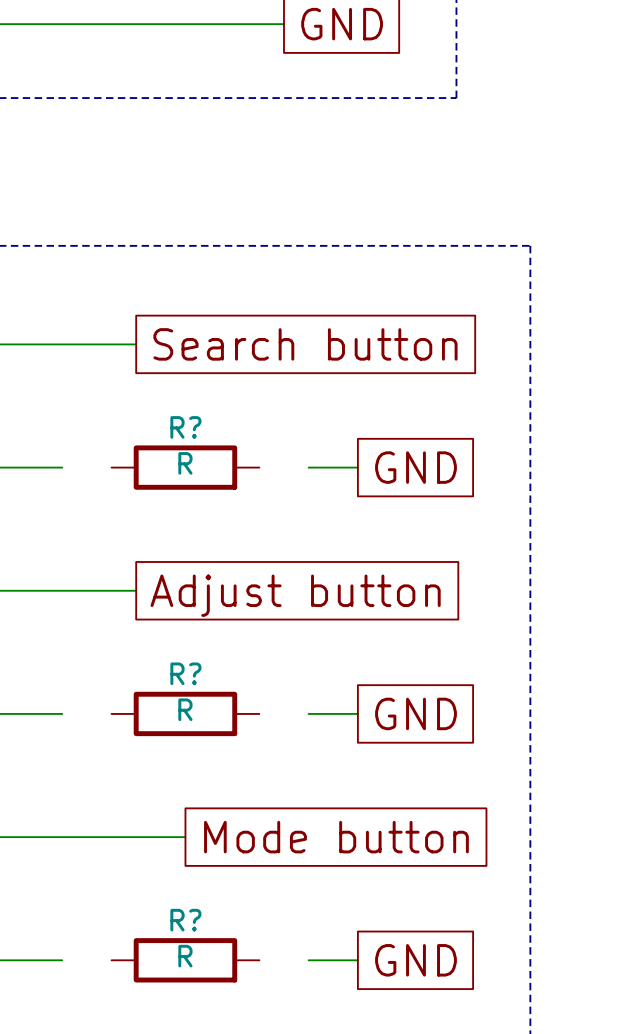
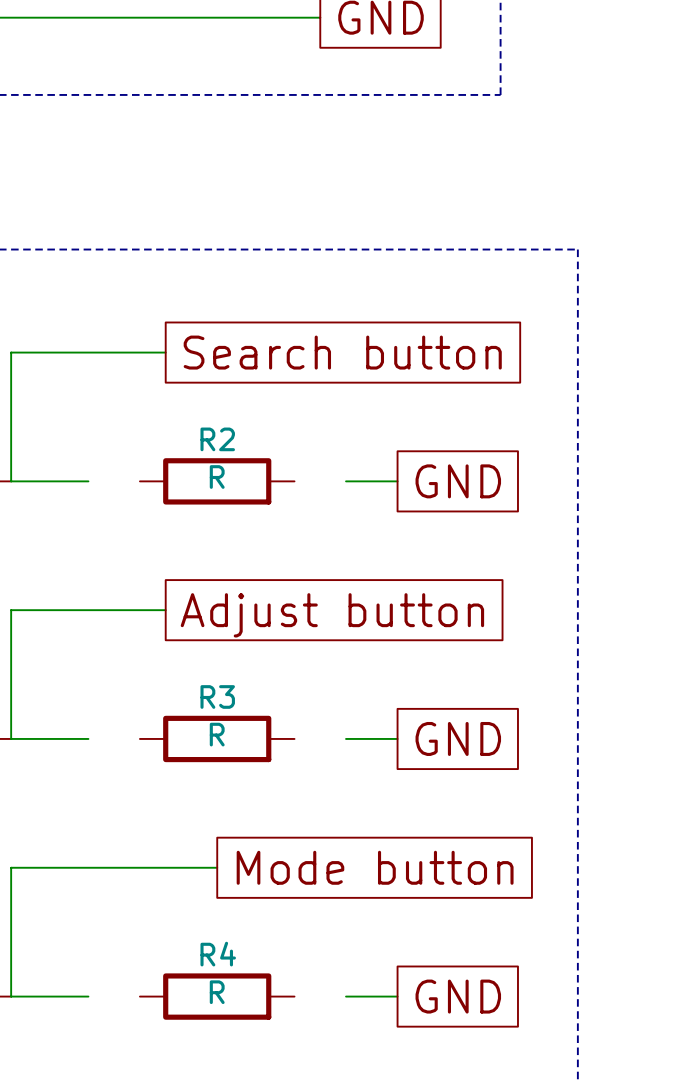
R? name: R? (185, 427) -> R2 (217, 439)
R? name: R? (185, 673) -> R3 (217, 696)
R? name: R? (185, 920) -> R4 (218, 954)

